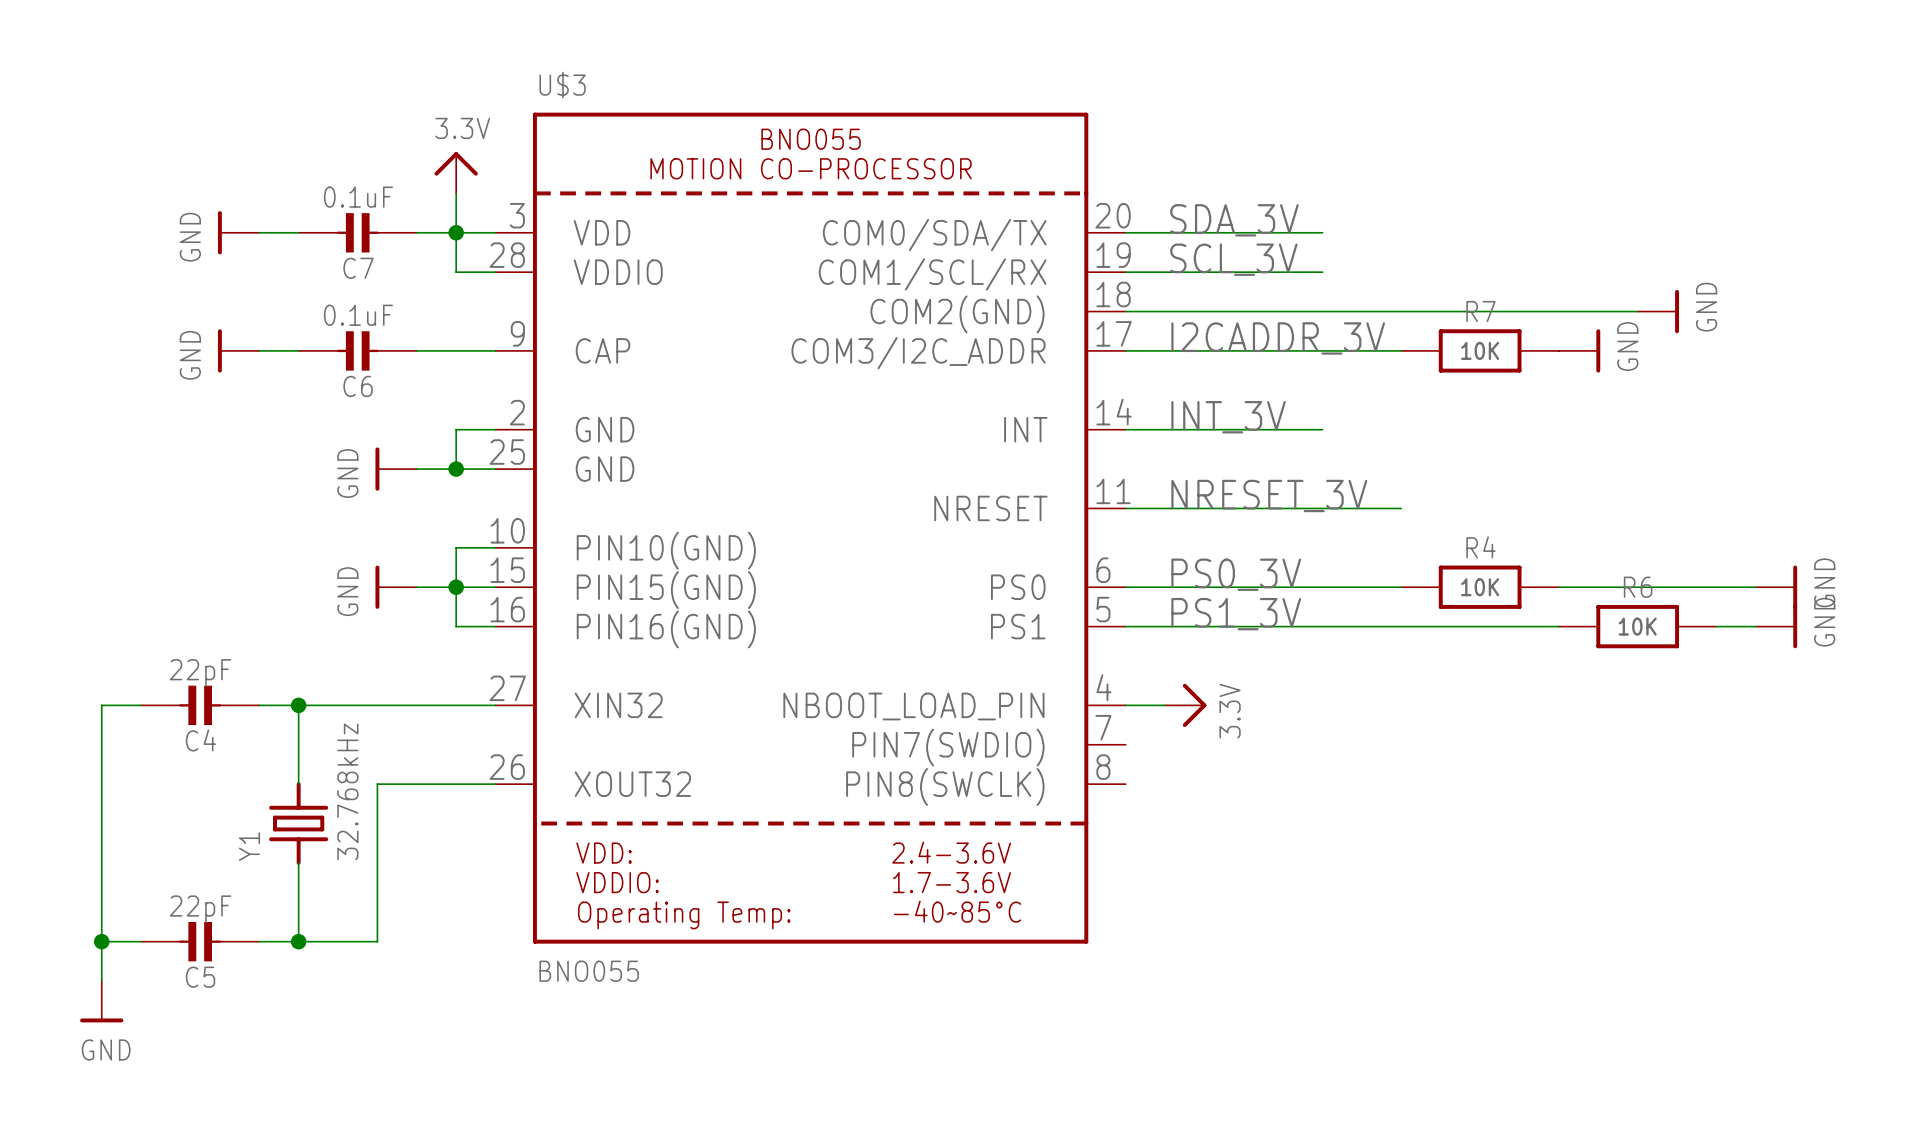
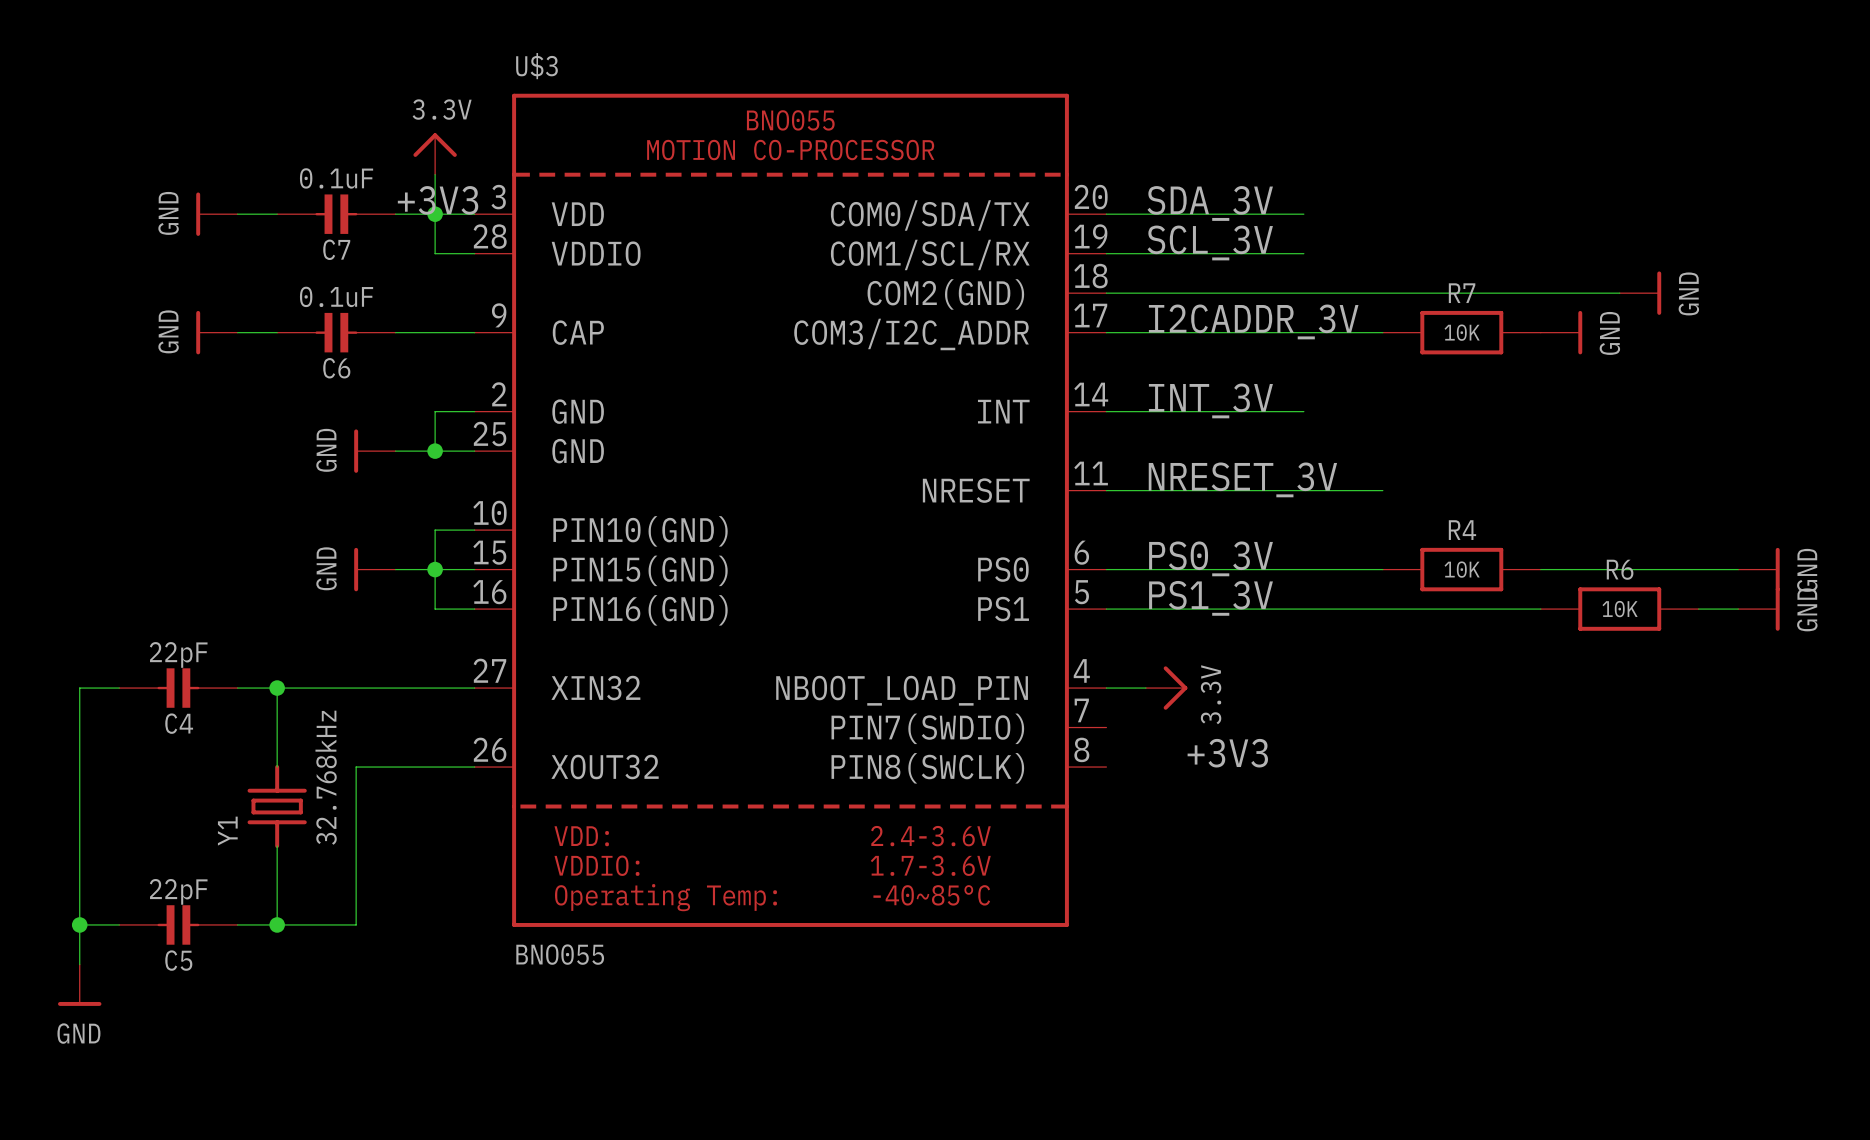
label: none -> +3V3 (438, 200)
label: none -> +3V3 (1227, 753)

